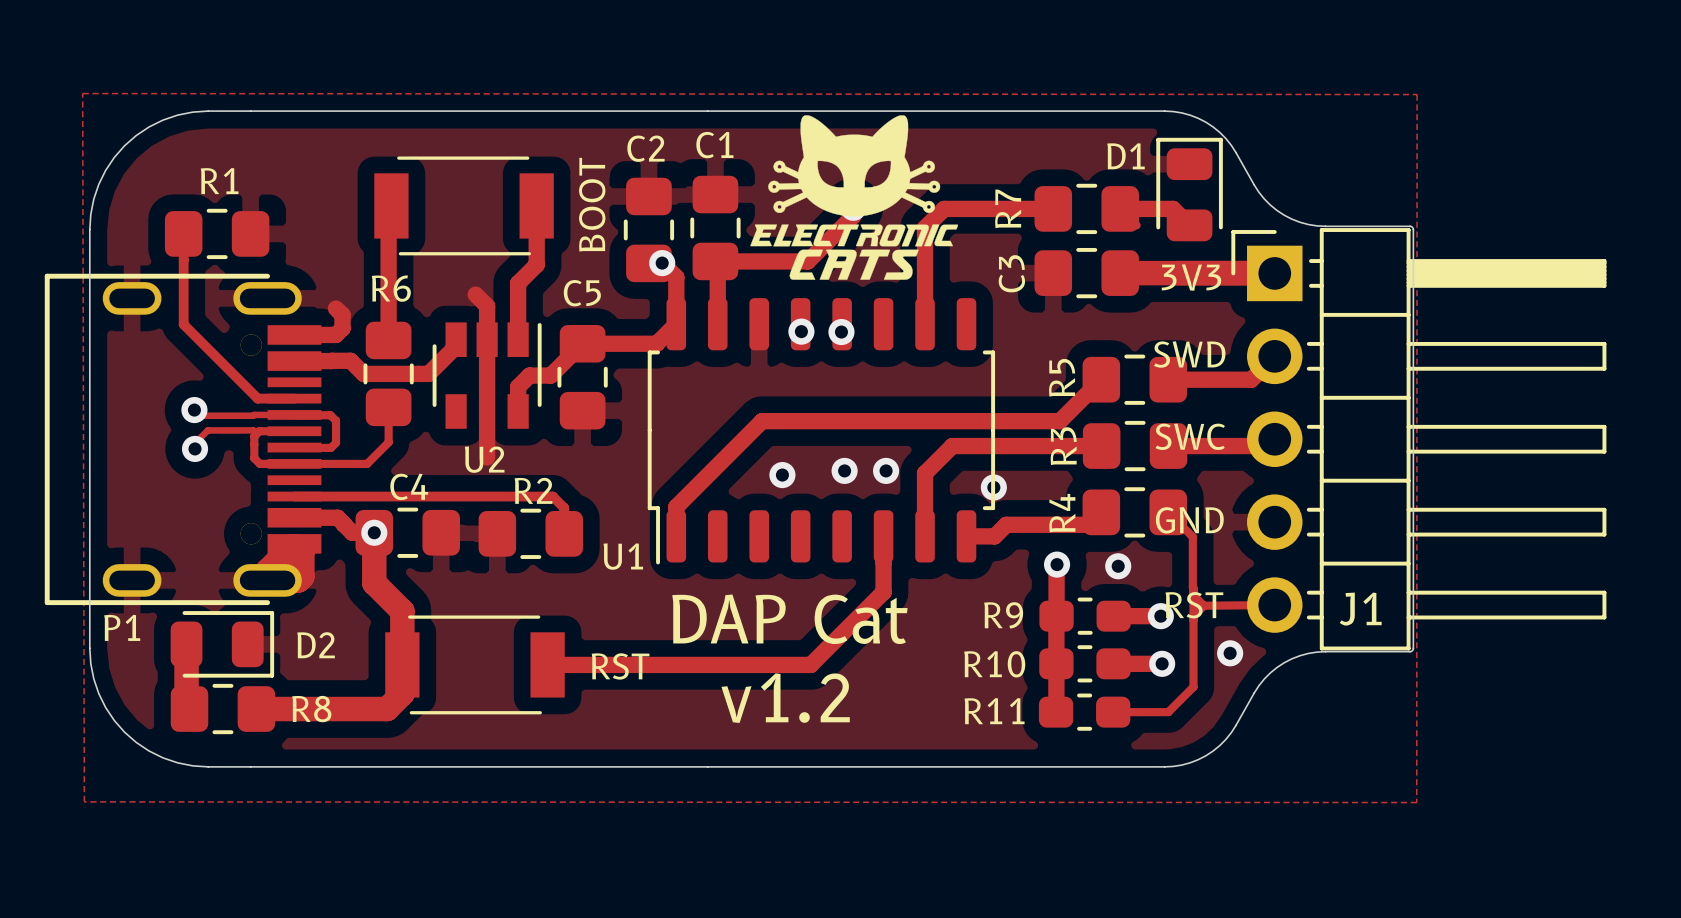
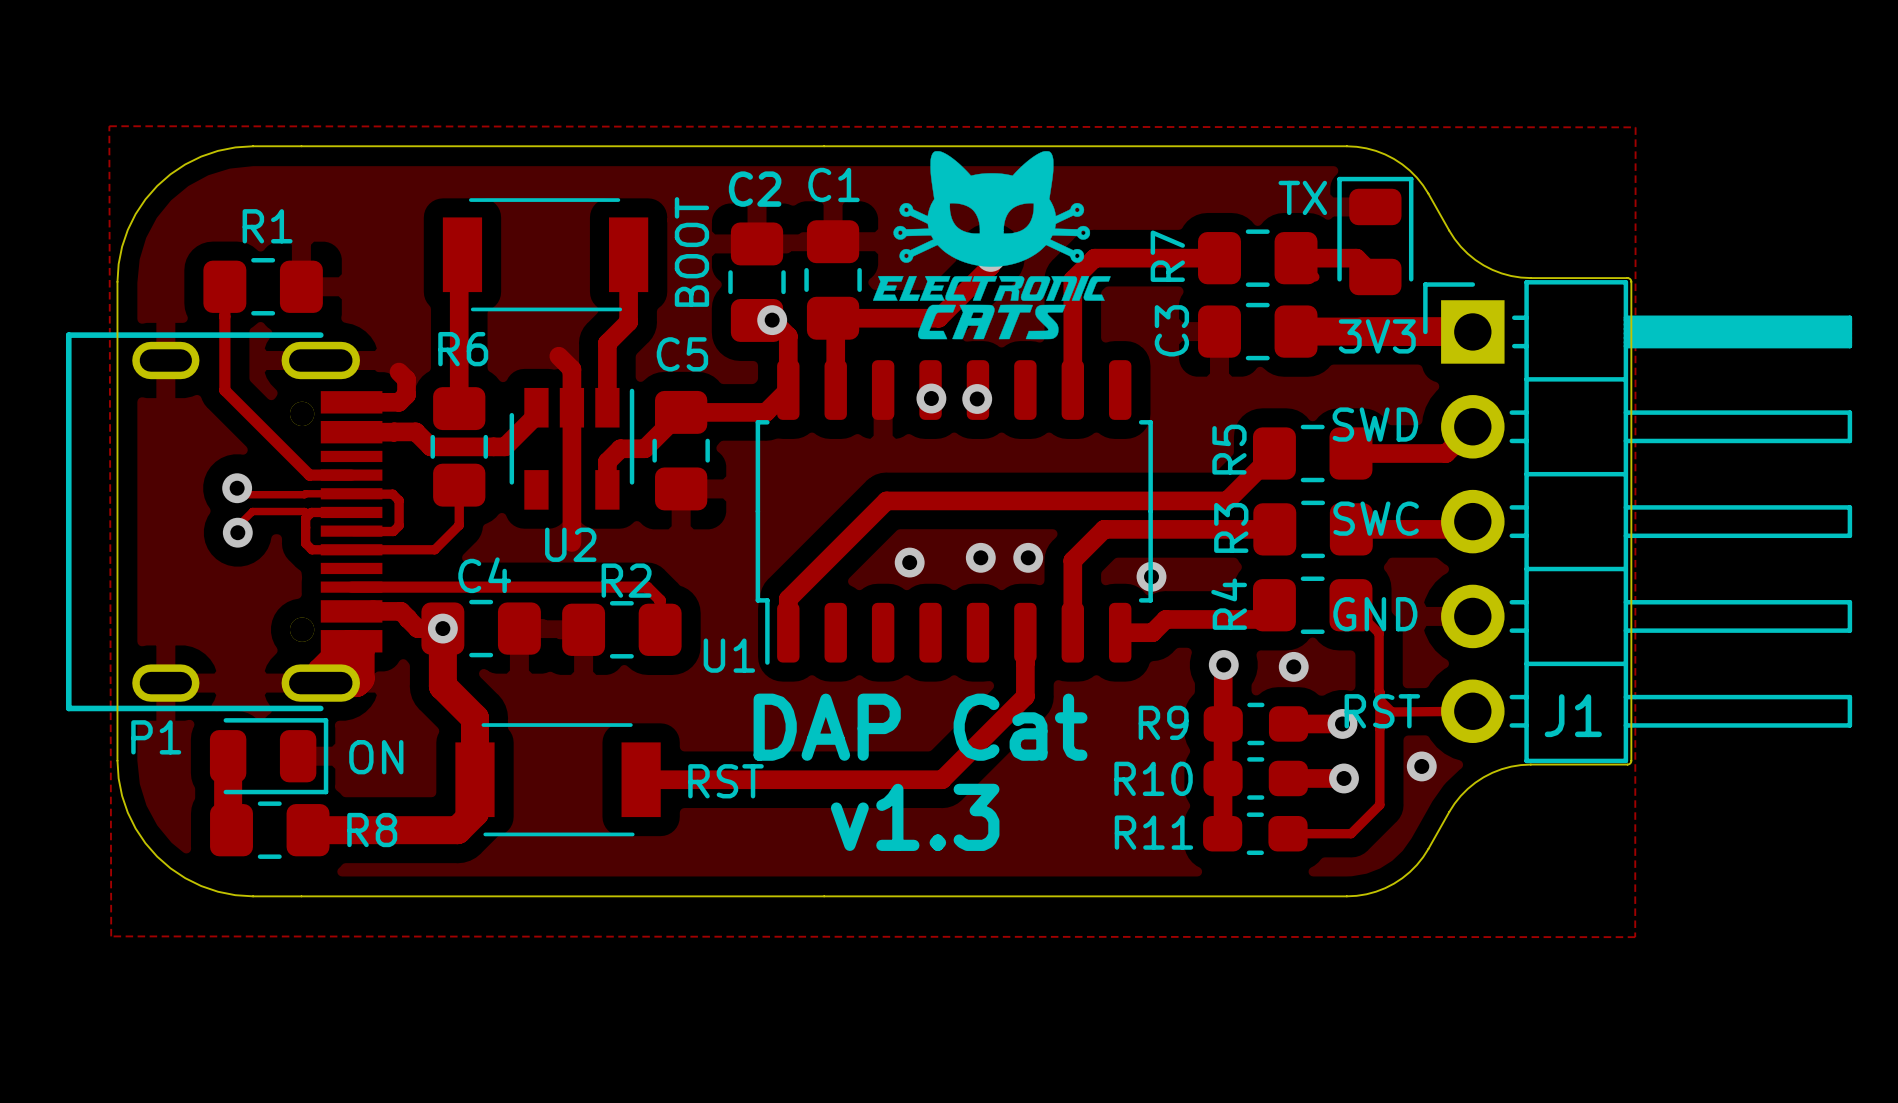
D1 name: D1 (1126, 156) -> TX (1302, 197)
D2 name: D2 (316, 645) -> ON (376, 757)
text: v1.2 (785, 698) -> v1.3 (915, 817)

